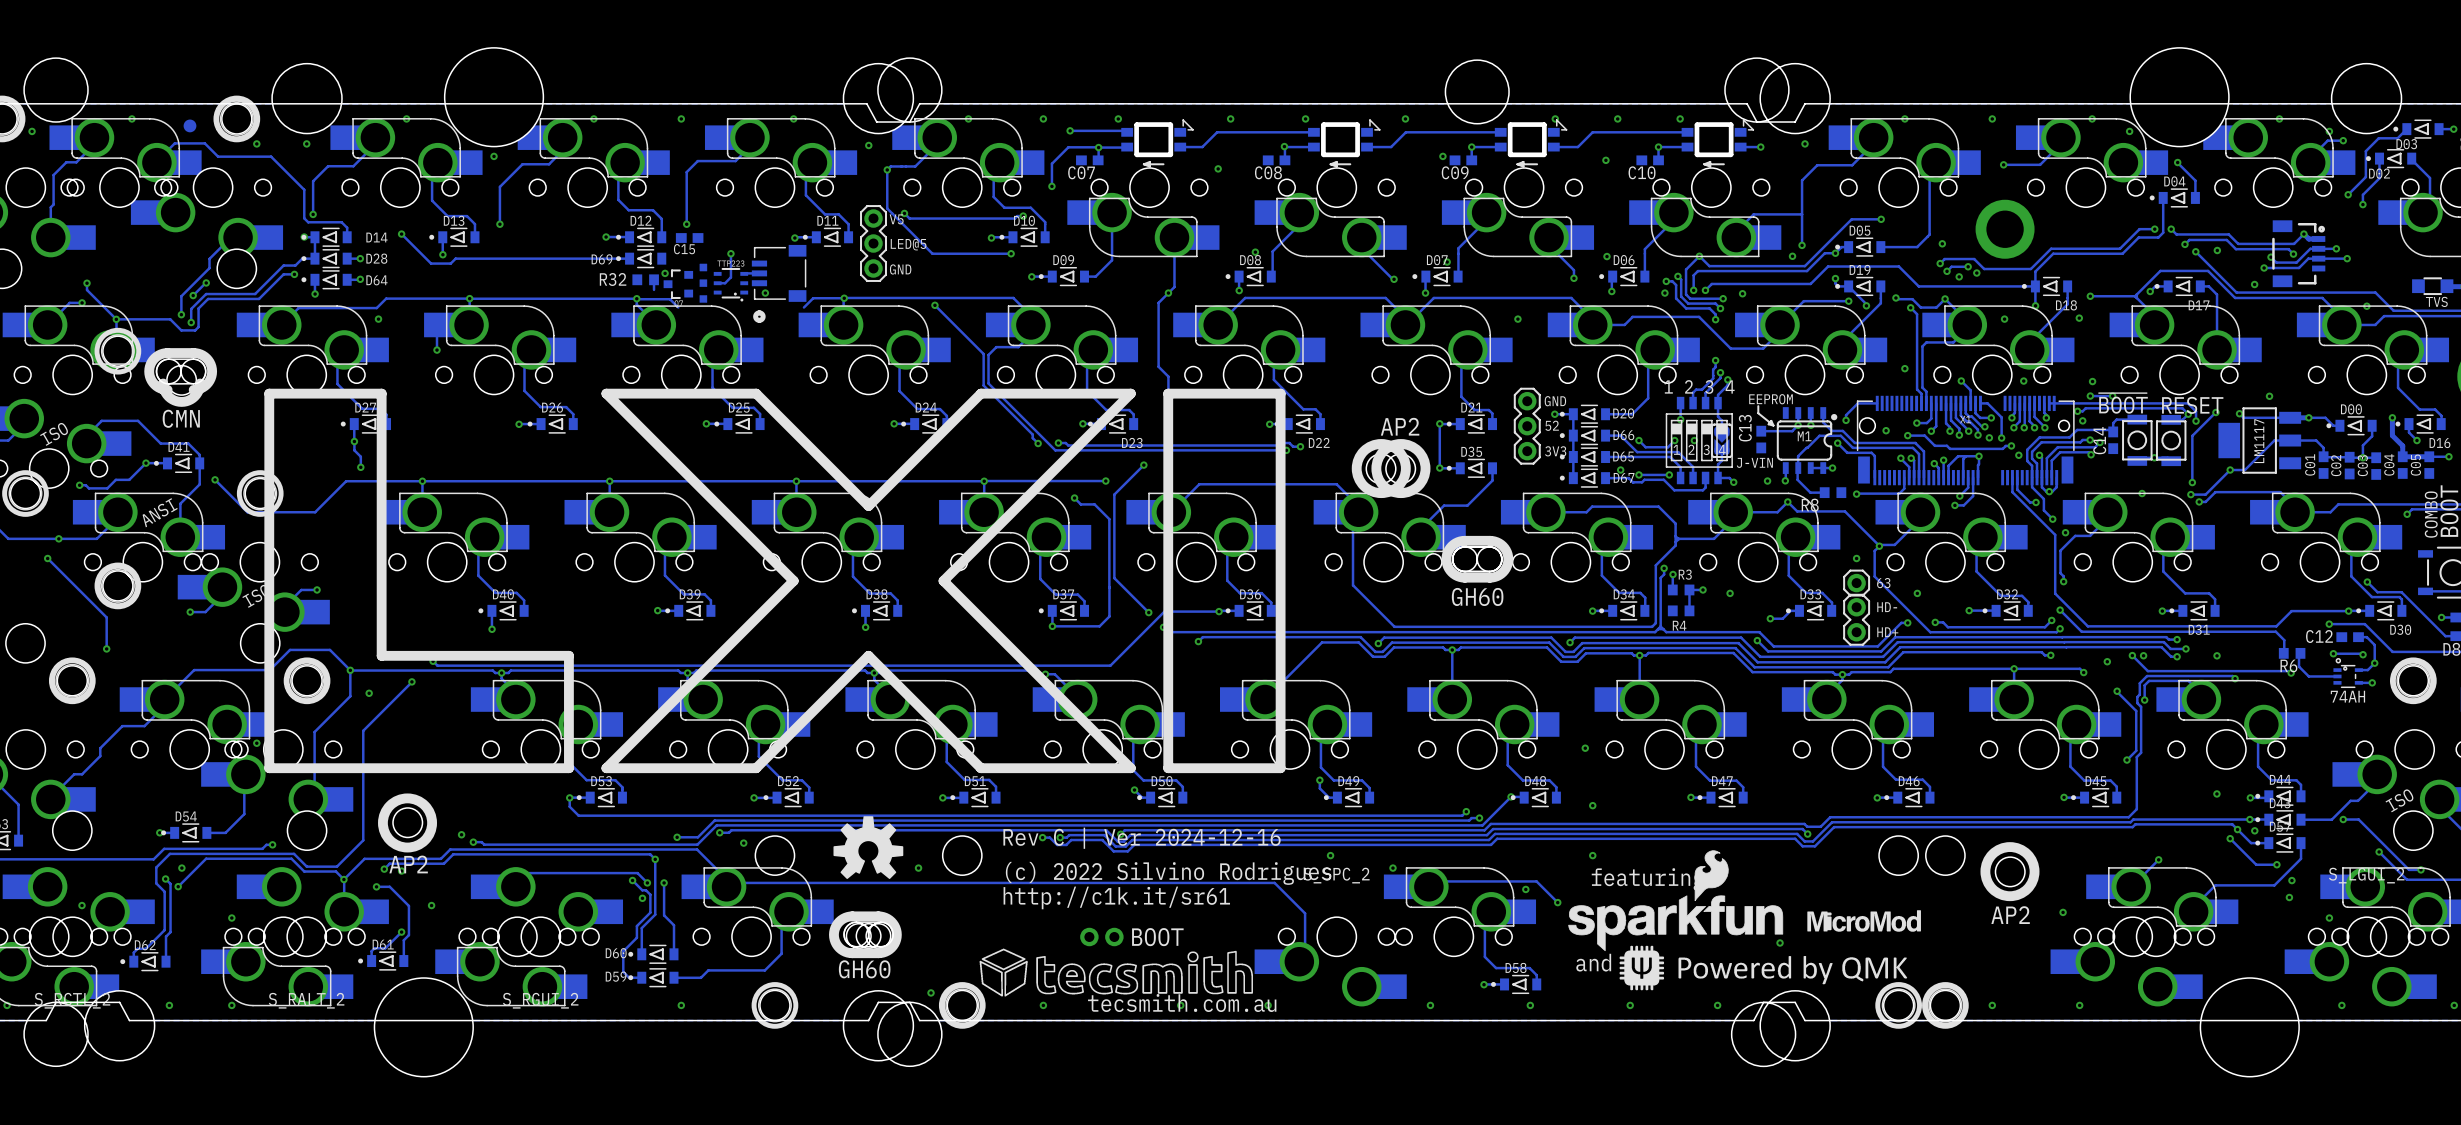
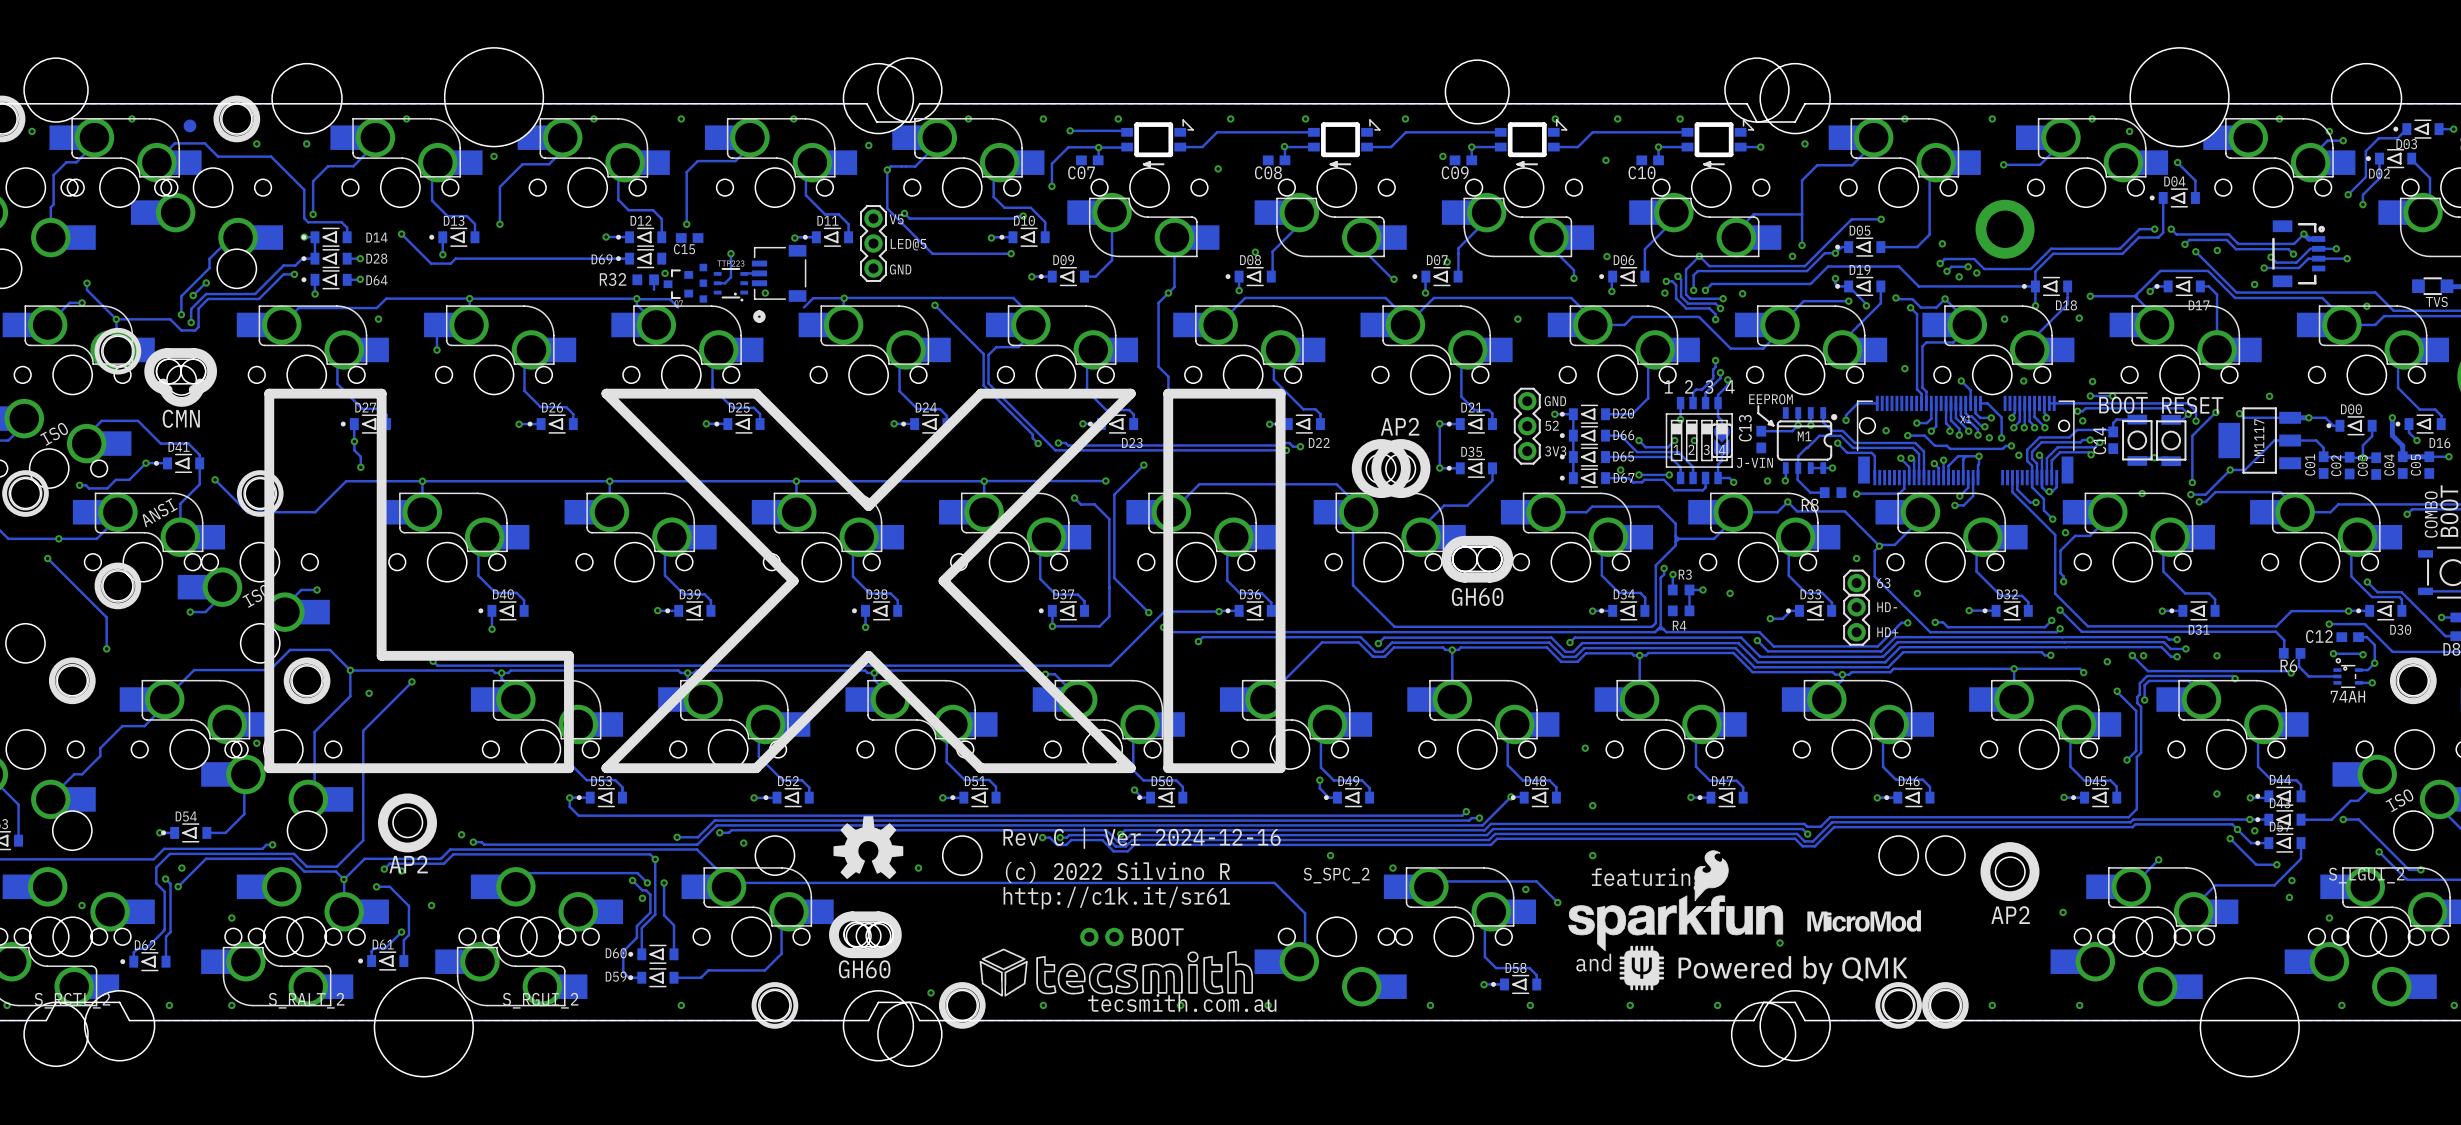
text: (c) 2022 Silvino Rodrigues (1168, 873) -> (c) 2022 Silvino R (1117, 872)

